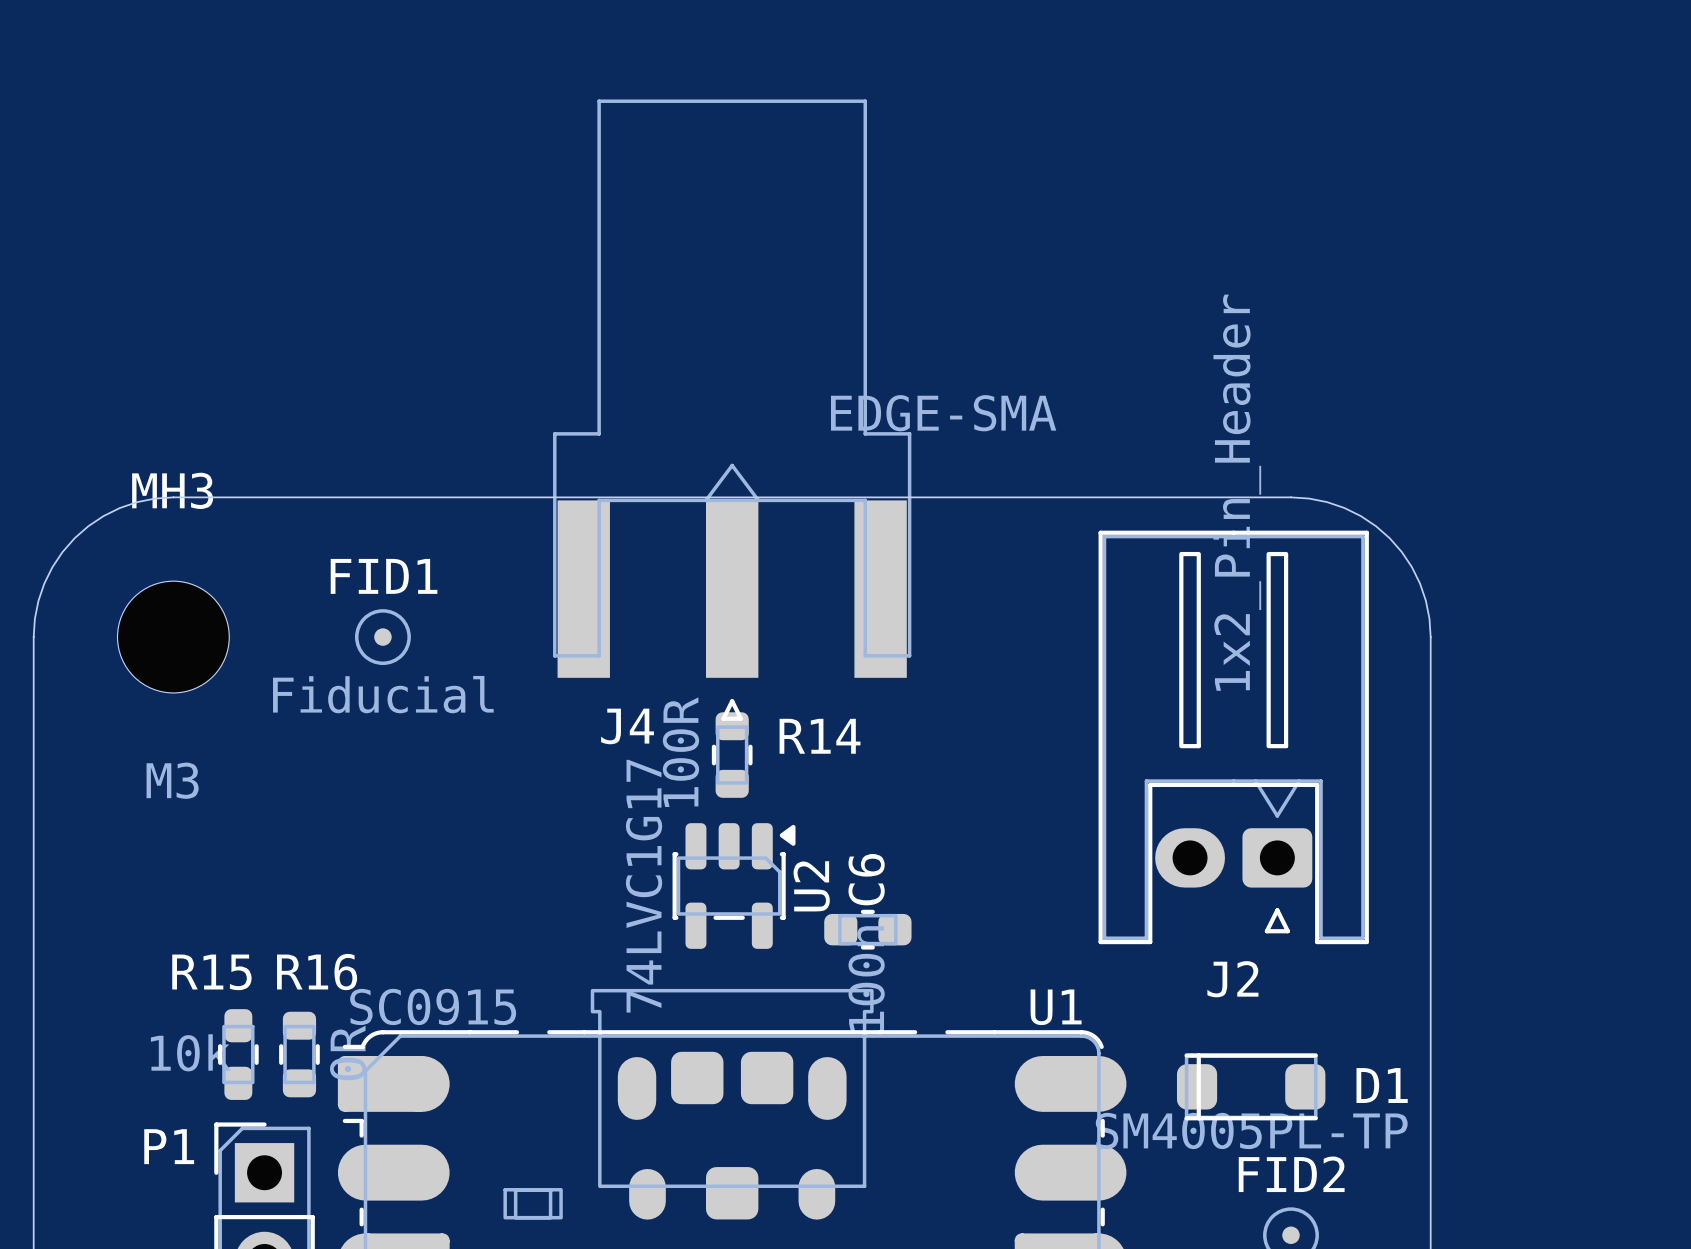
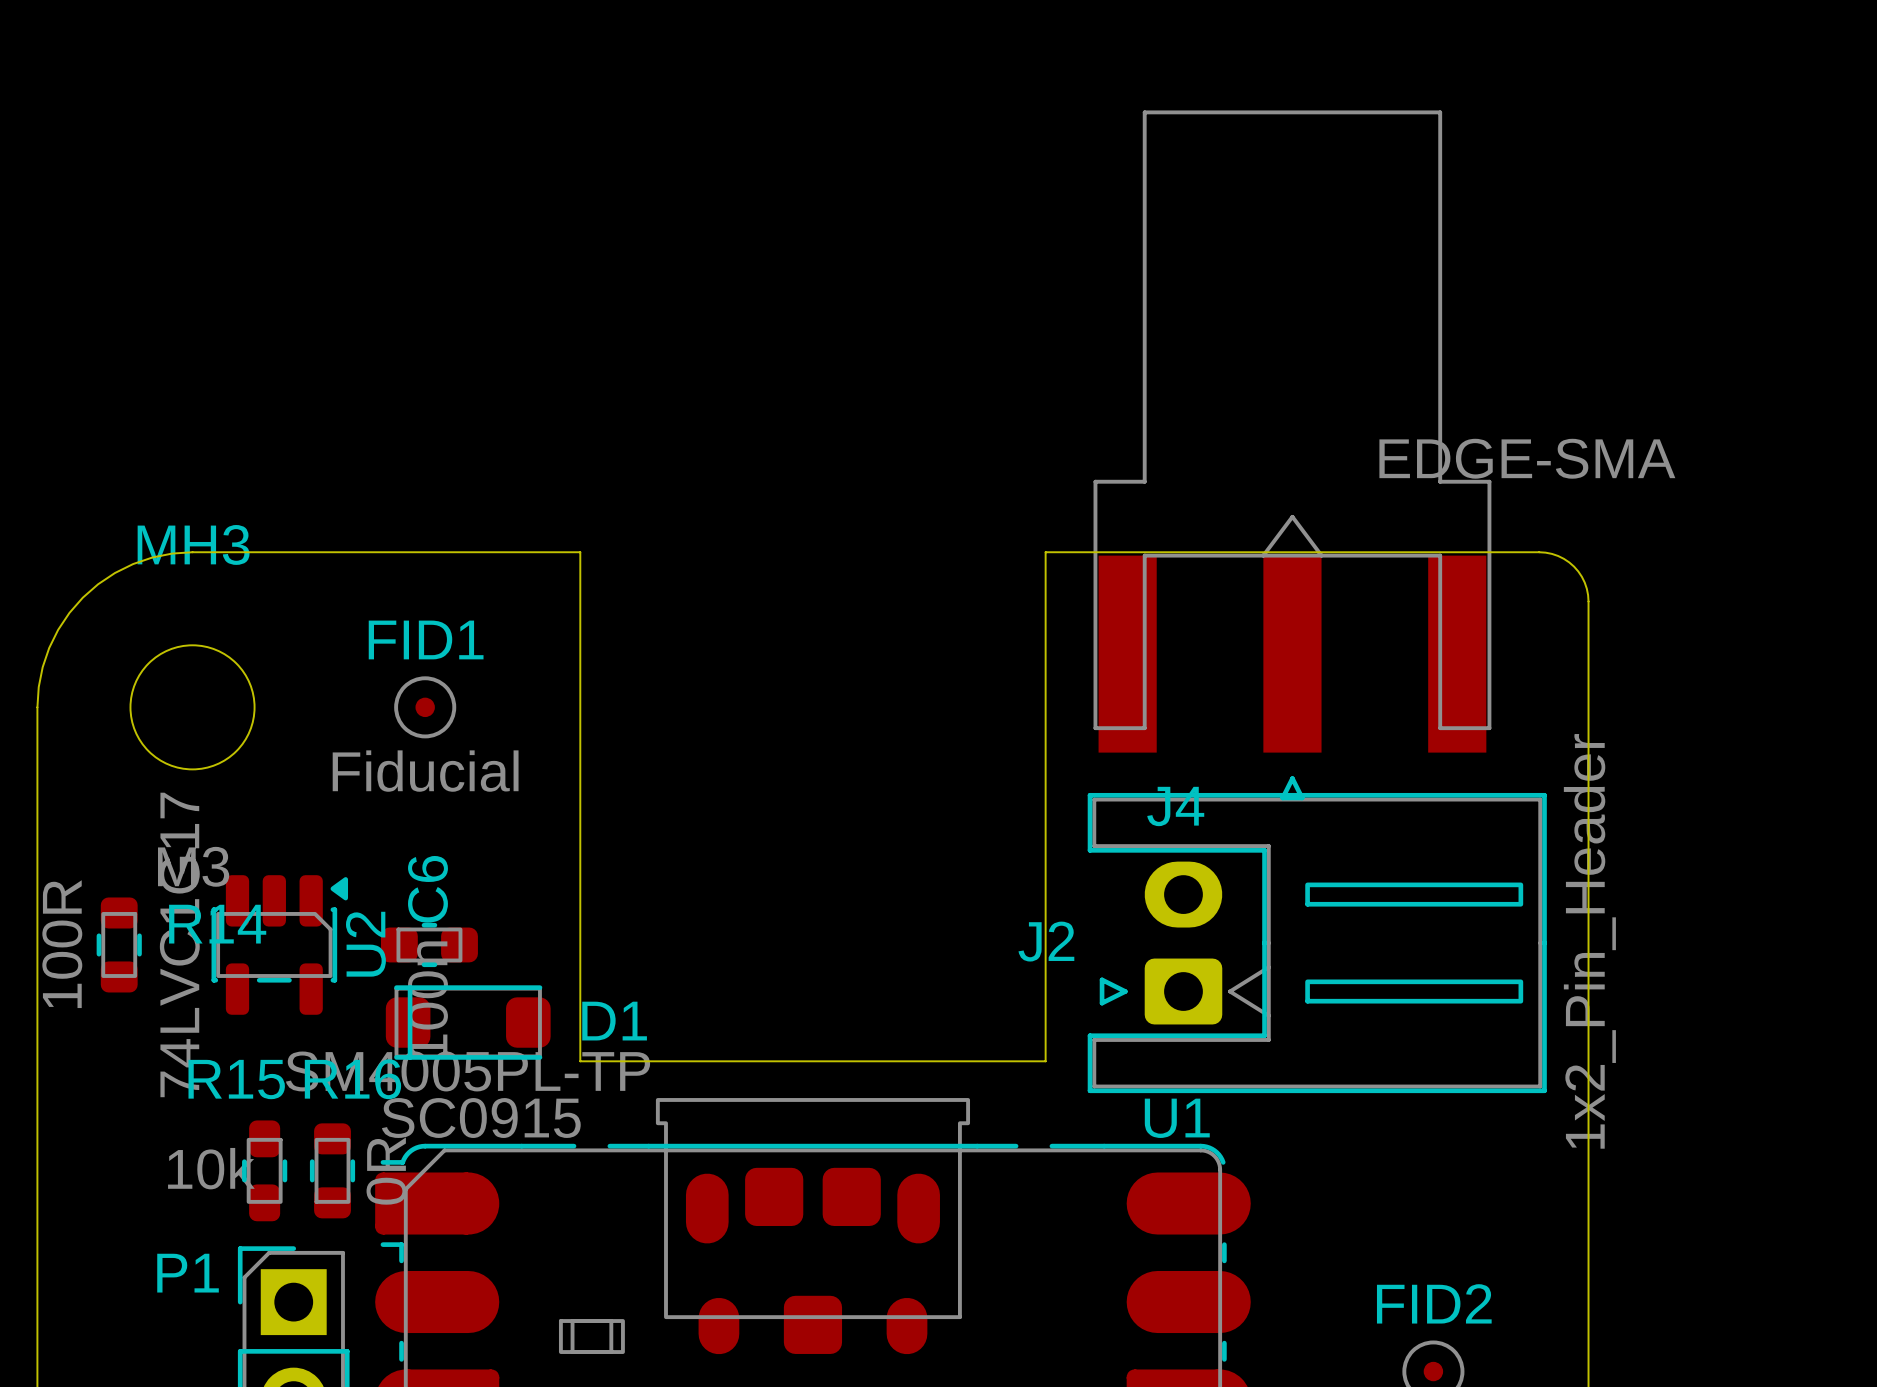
J4 position: (732, 410) -> (1292, 455)
J2 value position: 1x2_Pin_Header (1237, 492) -> 1x2_Pin_Header (1589, 941)
board edge: (522, 497) (941, 497) -> (580, 552) (580, 1061) (1045, 1061) (1045, 552)
board edge: (1290, 497) (1309, 498) (1344, 508) (1376, 526) (1389, 538) (1401, 552) (1420, 583) (1425, 600) (1430, 637) -> (1433, 552) (1545, 552) (1563, 558) (1574, 566) (1581, 576) (1588, 595) (1588, 707)
J2 footprint: [1098, 530, 1369, 945] -> [1087, 792, 1547, 1094]
R14 position: (732, 755) -> (119, 944)
U2 position: (734, 886) -> (279, 944)
C6 position: (867, 929) -> (429, 944)
J2 name position: J2 (1232, 979) -> J2 (1046, 941)
D1 position: (1251, 1086) -> (468, 1022)

